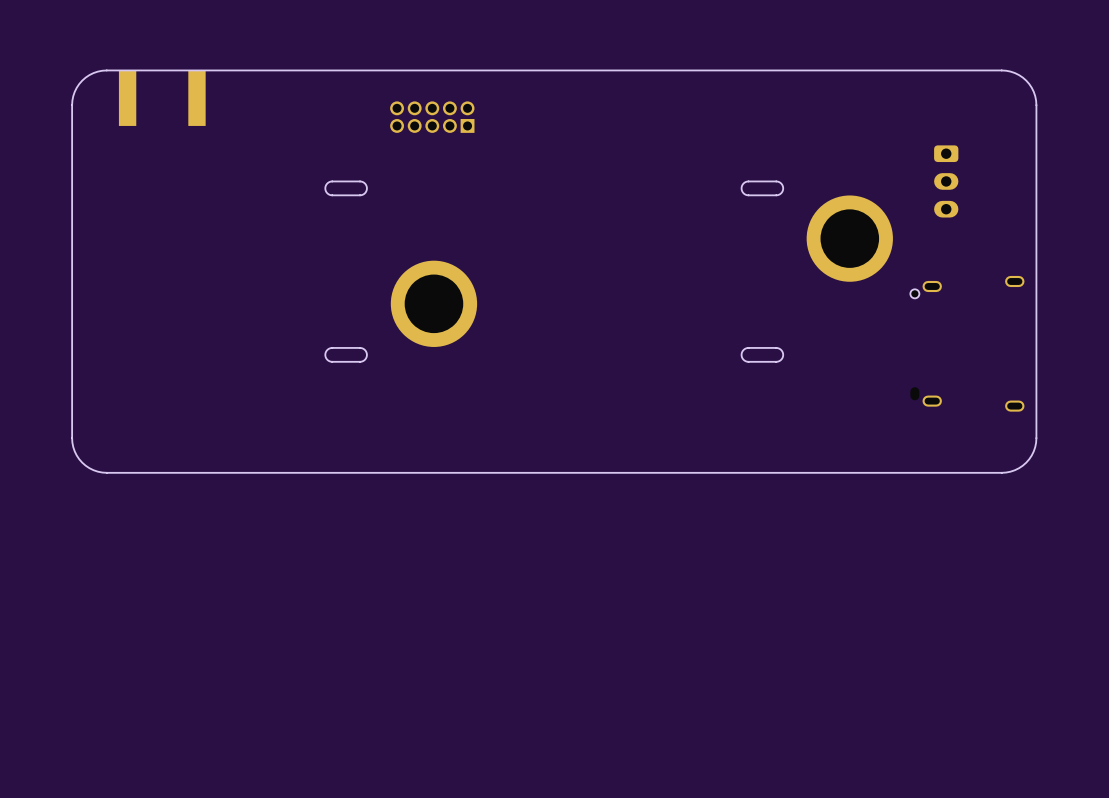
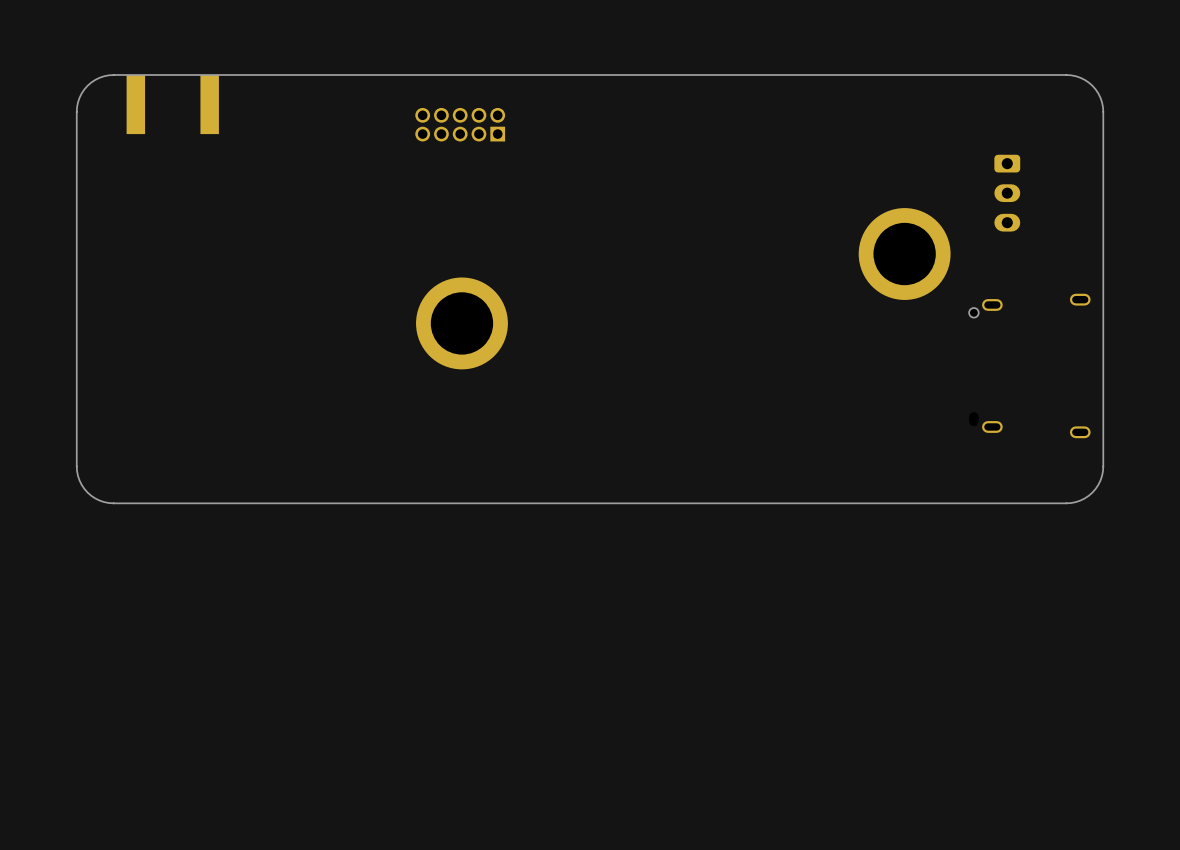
board edge: (360, 181) (330, 181) (326, 184) (325, 190) (331, 195) (361, 195) (365, 192) (366, 187) (364, 183) (360, 181) -> none
board edge: (776, 181) (746, 181) (742, 184) (741, 190) (747, 195) (778, 195) (782, 191) (783, 187) (780, 182) (776, 181) -> none
board edge: (360, 347) (330, 348) (326, 351) (325, 356) (331, 361) (361, 361) (365, 359) (366, 353) (364, 349) (360, 347) -> none
board edge: (776, 347) (746, 348) (742, 351) (741, 356) (747, 361) (778, 361) (782, 358) (783, 353) (780, 349) (776, 347) -> none

